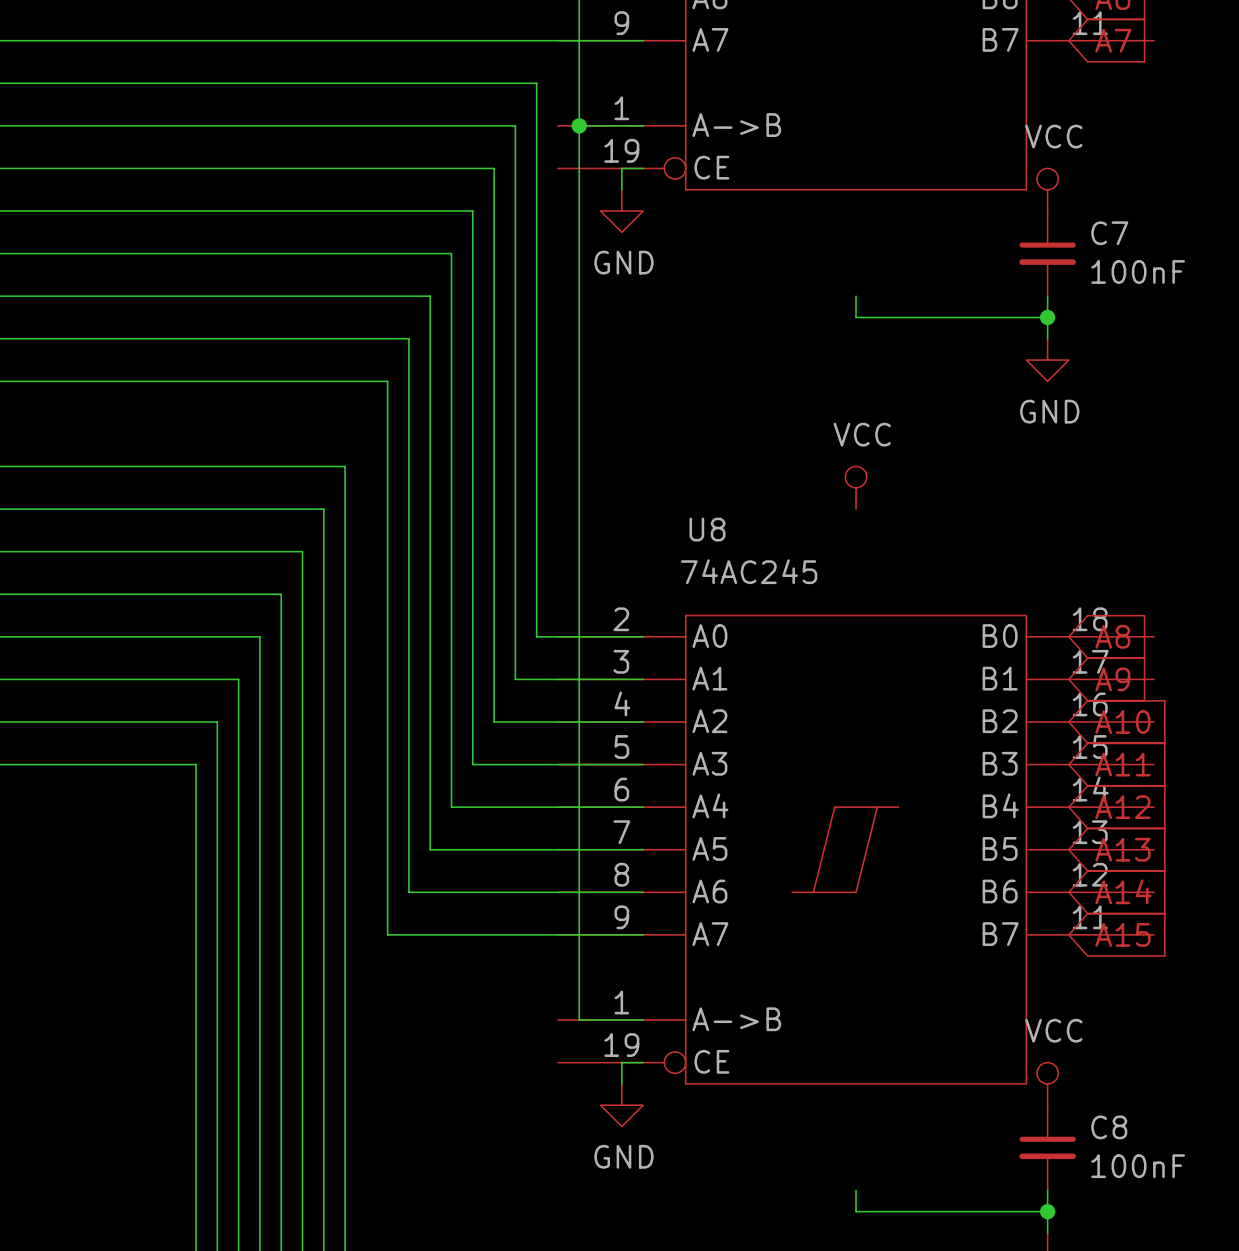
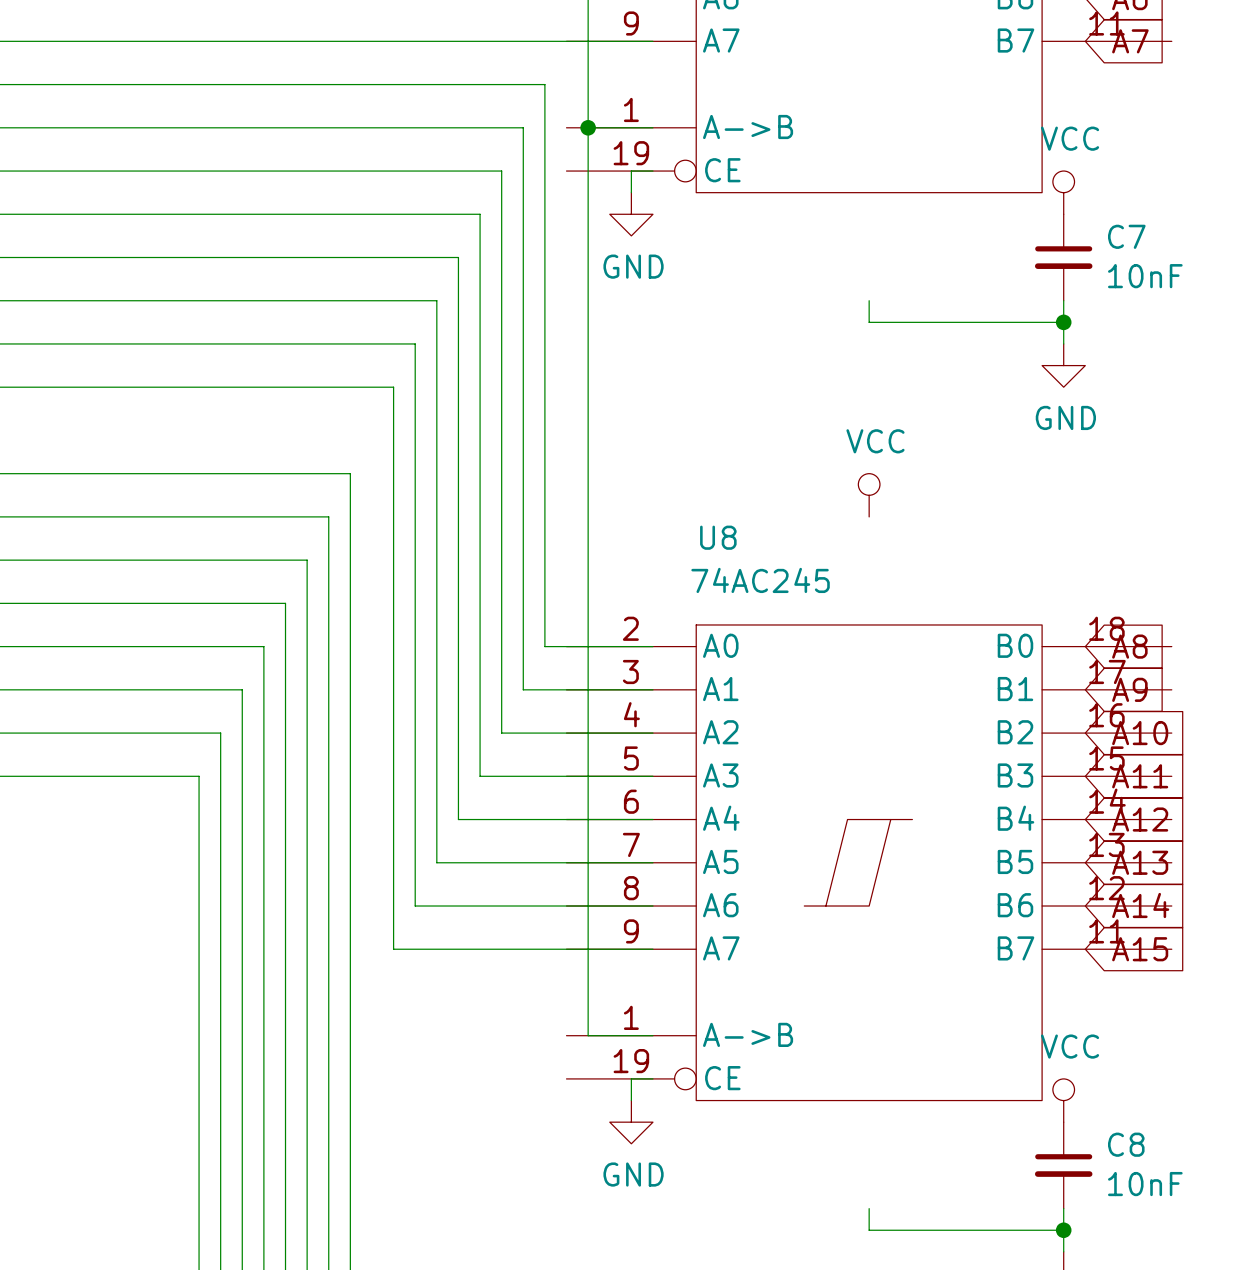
C7 value: 100nF (1138, 271) -> 10nF (1145, 276)
C8 value: 100nF (1138, 1166) -> 10nF (1145, 1184)

